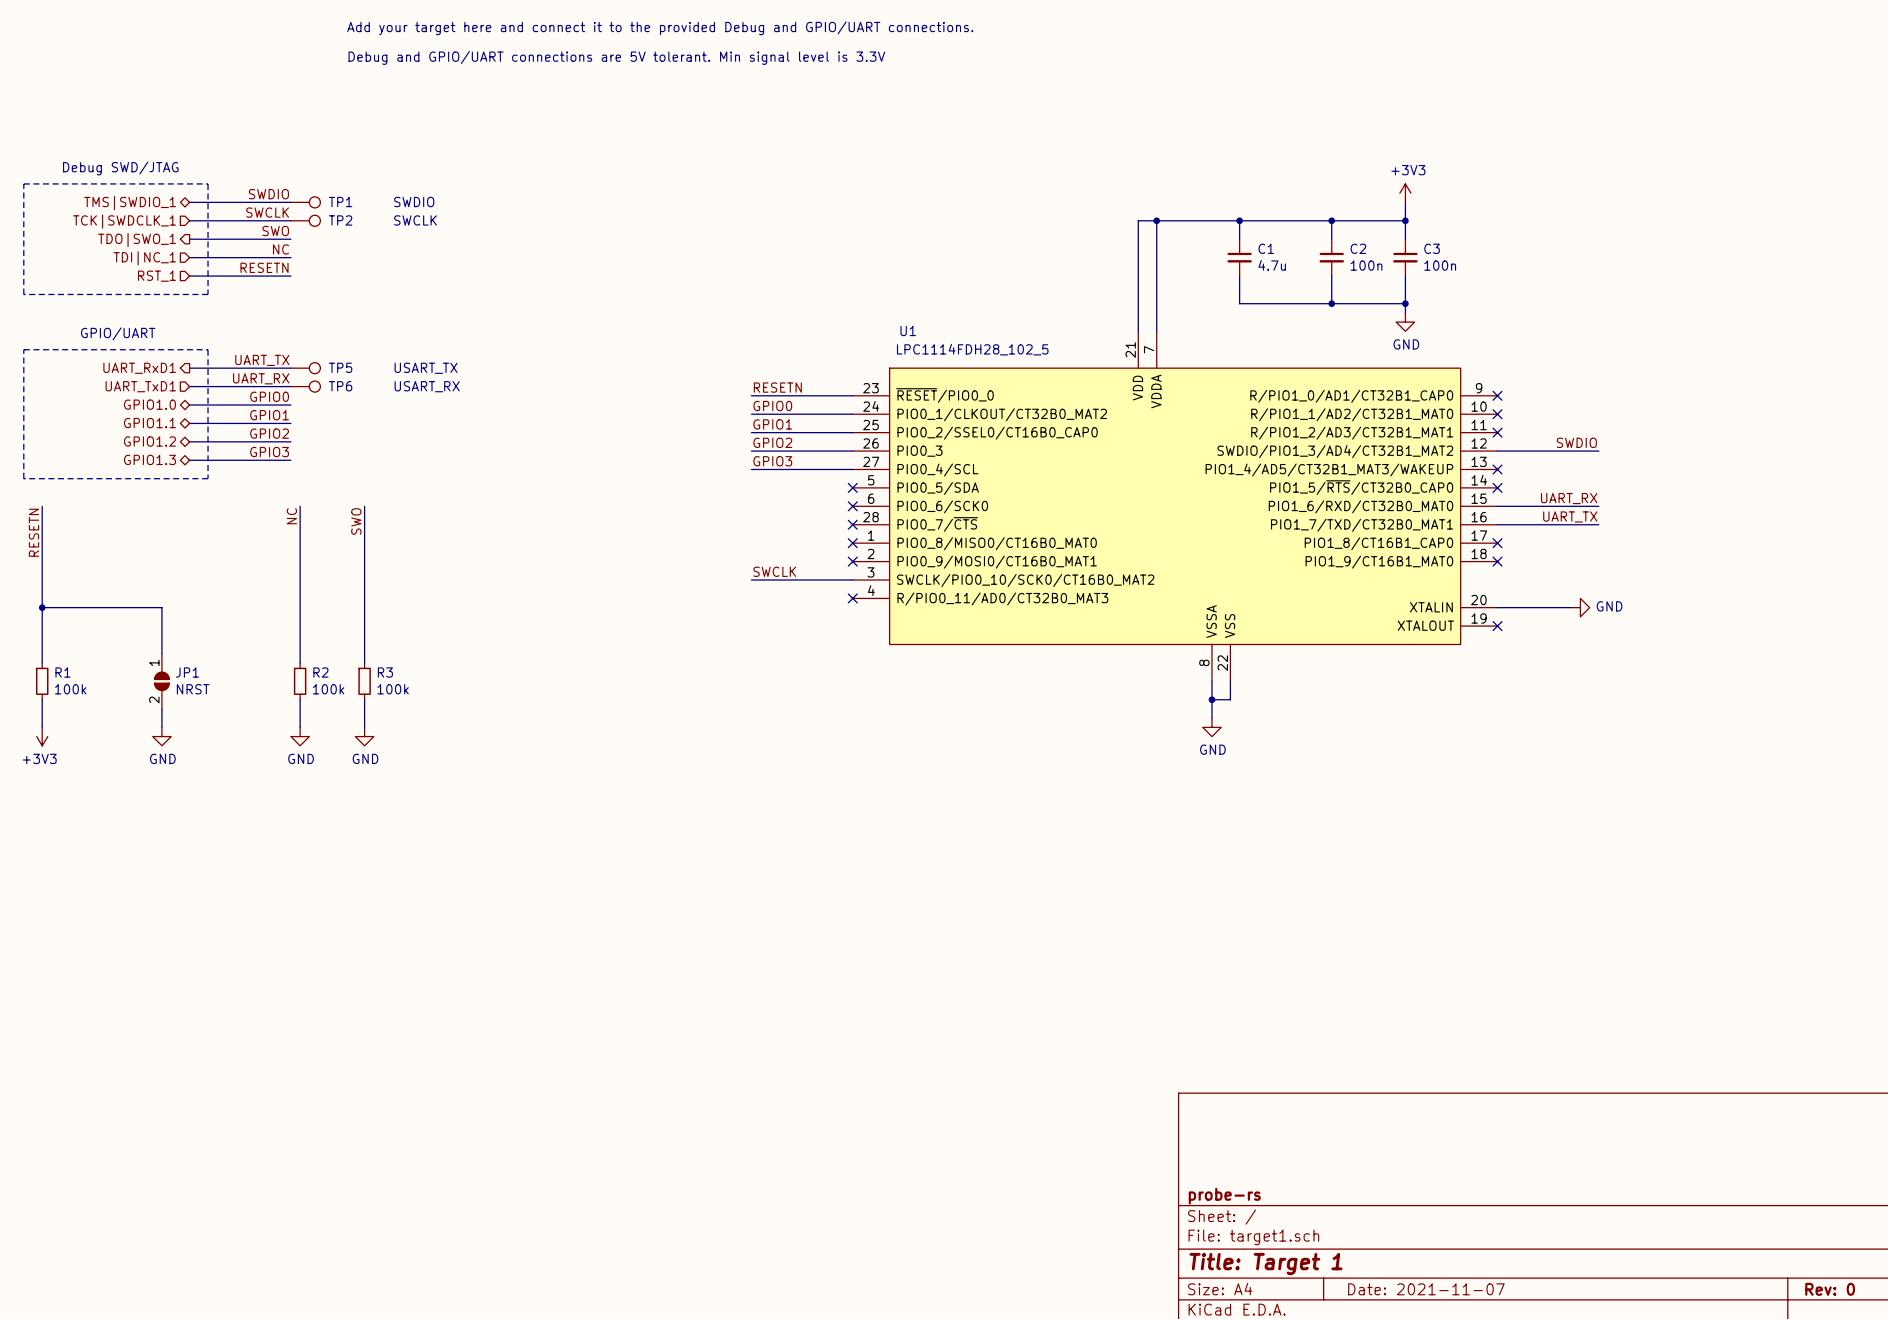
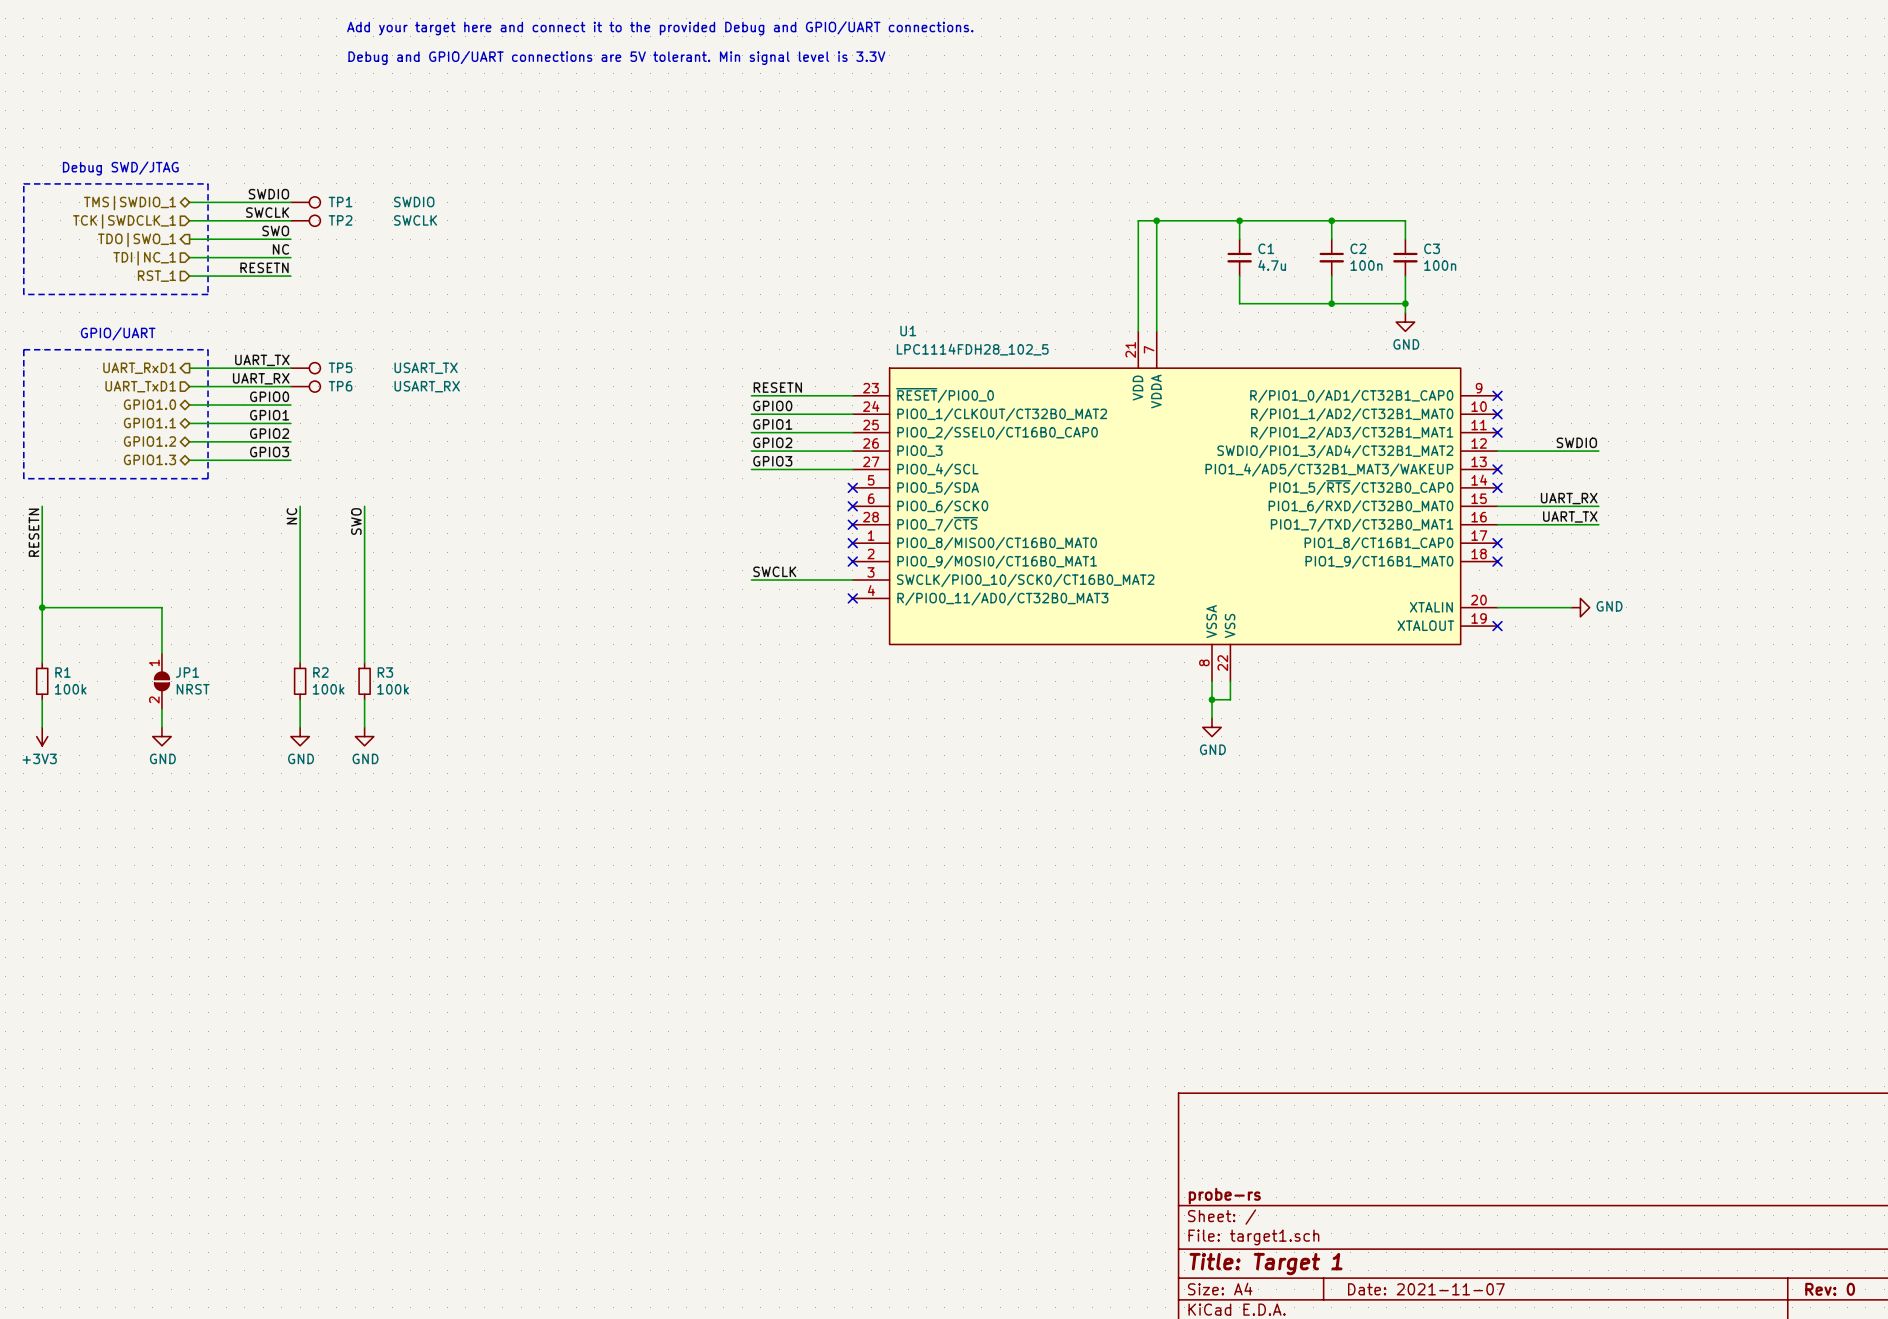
power symbol: +3V3 (1405, 193) -> none
wire: (1405, 202) (1405, 220) -> none
junction: (1405, 220) -> none

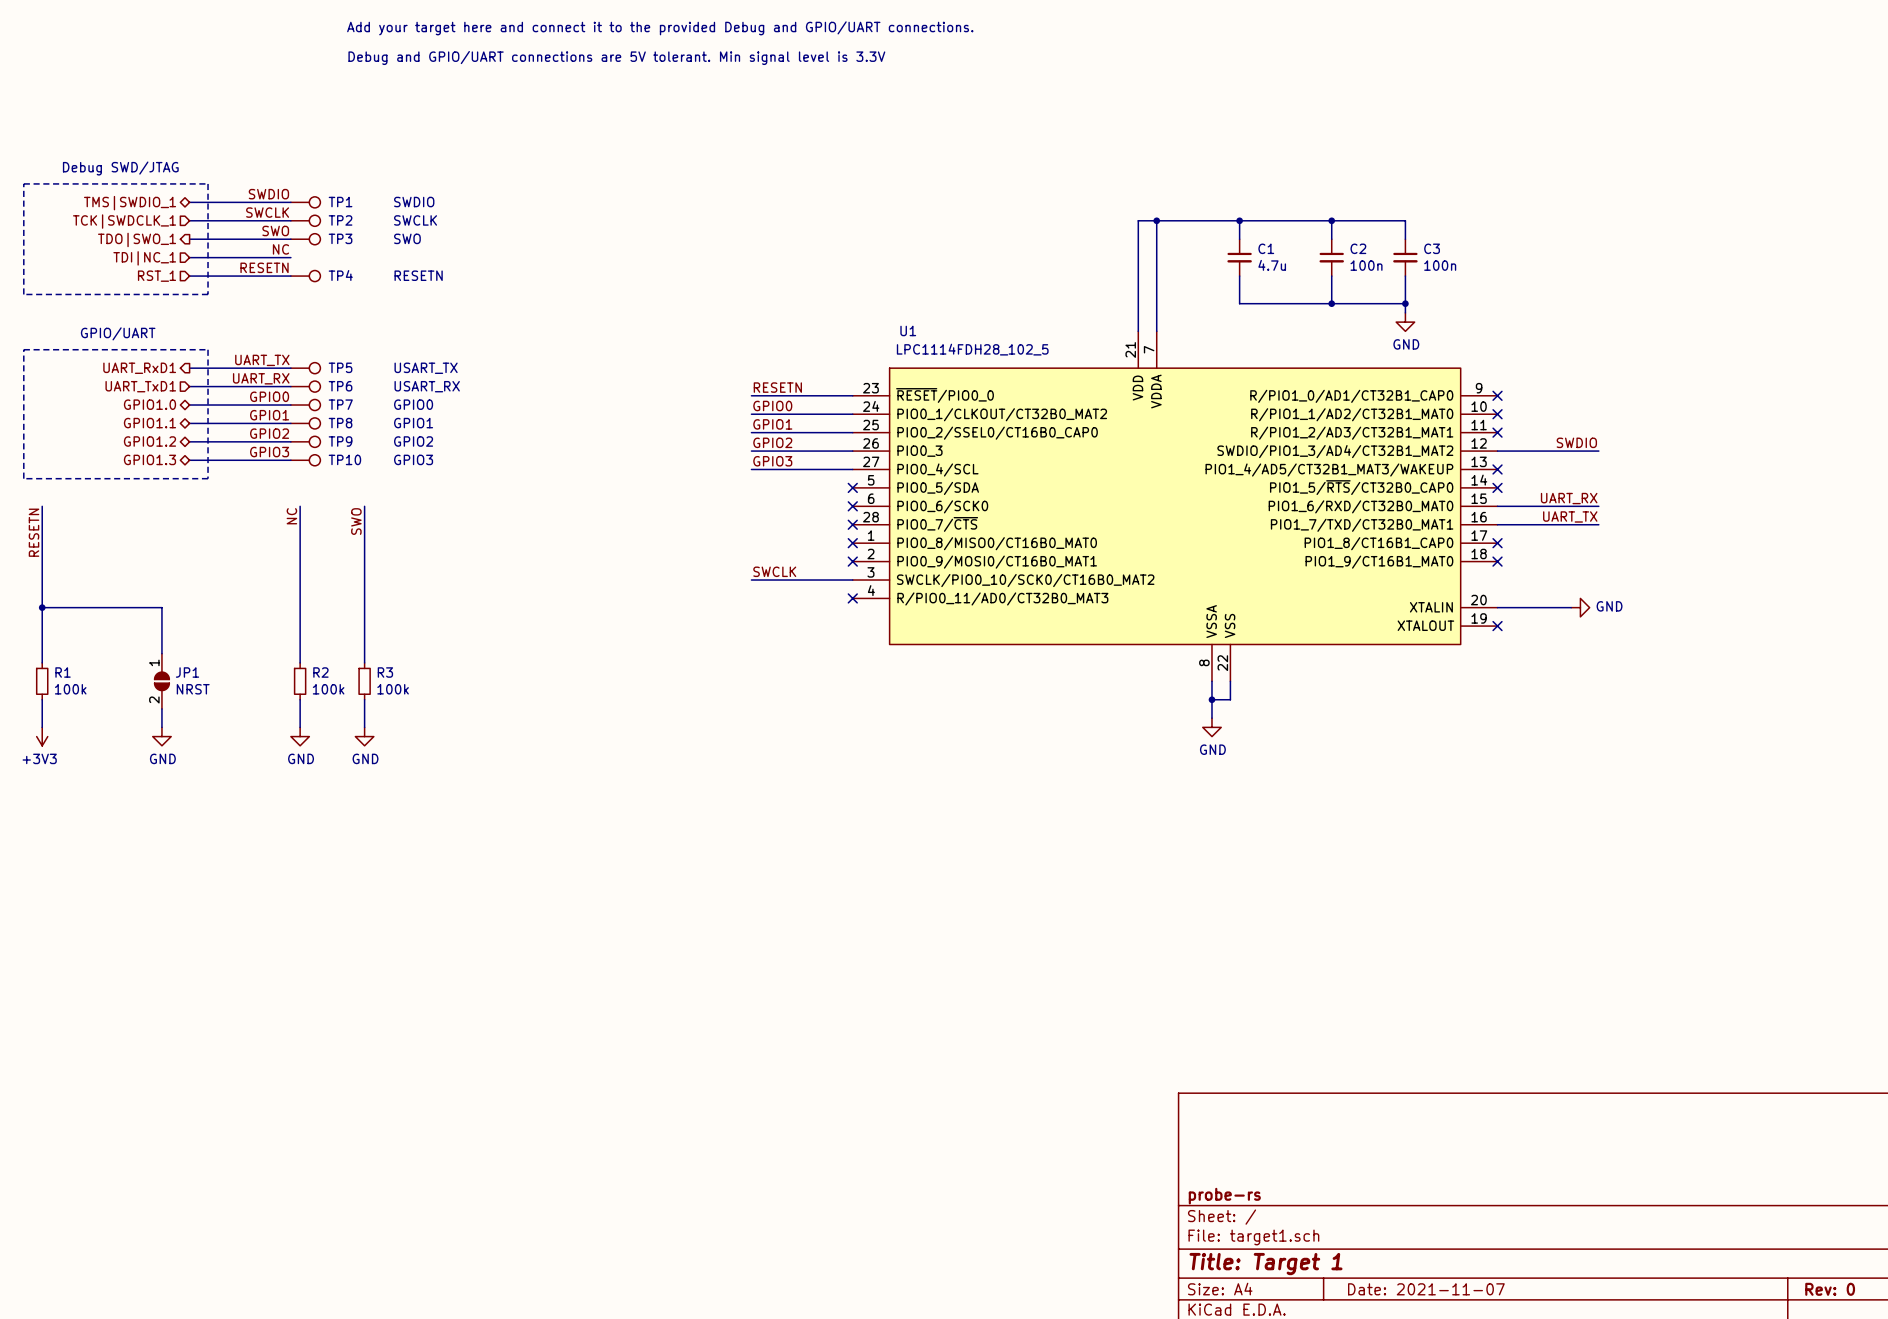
TP3: none -> SWO (305, 239)
TP4: none -> RESETN (305, 276)
TP7: none -> GPIO0 (305, 405)
TP8: none -> GPIO1 (305, 423)
TP9: none -> GPIO2 (305, 441)
TP10: none -> GPIO3 (305, 460)

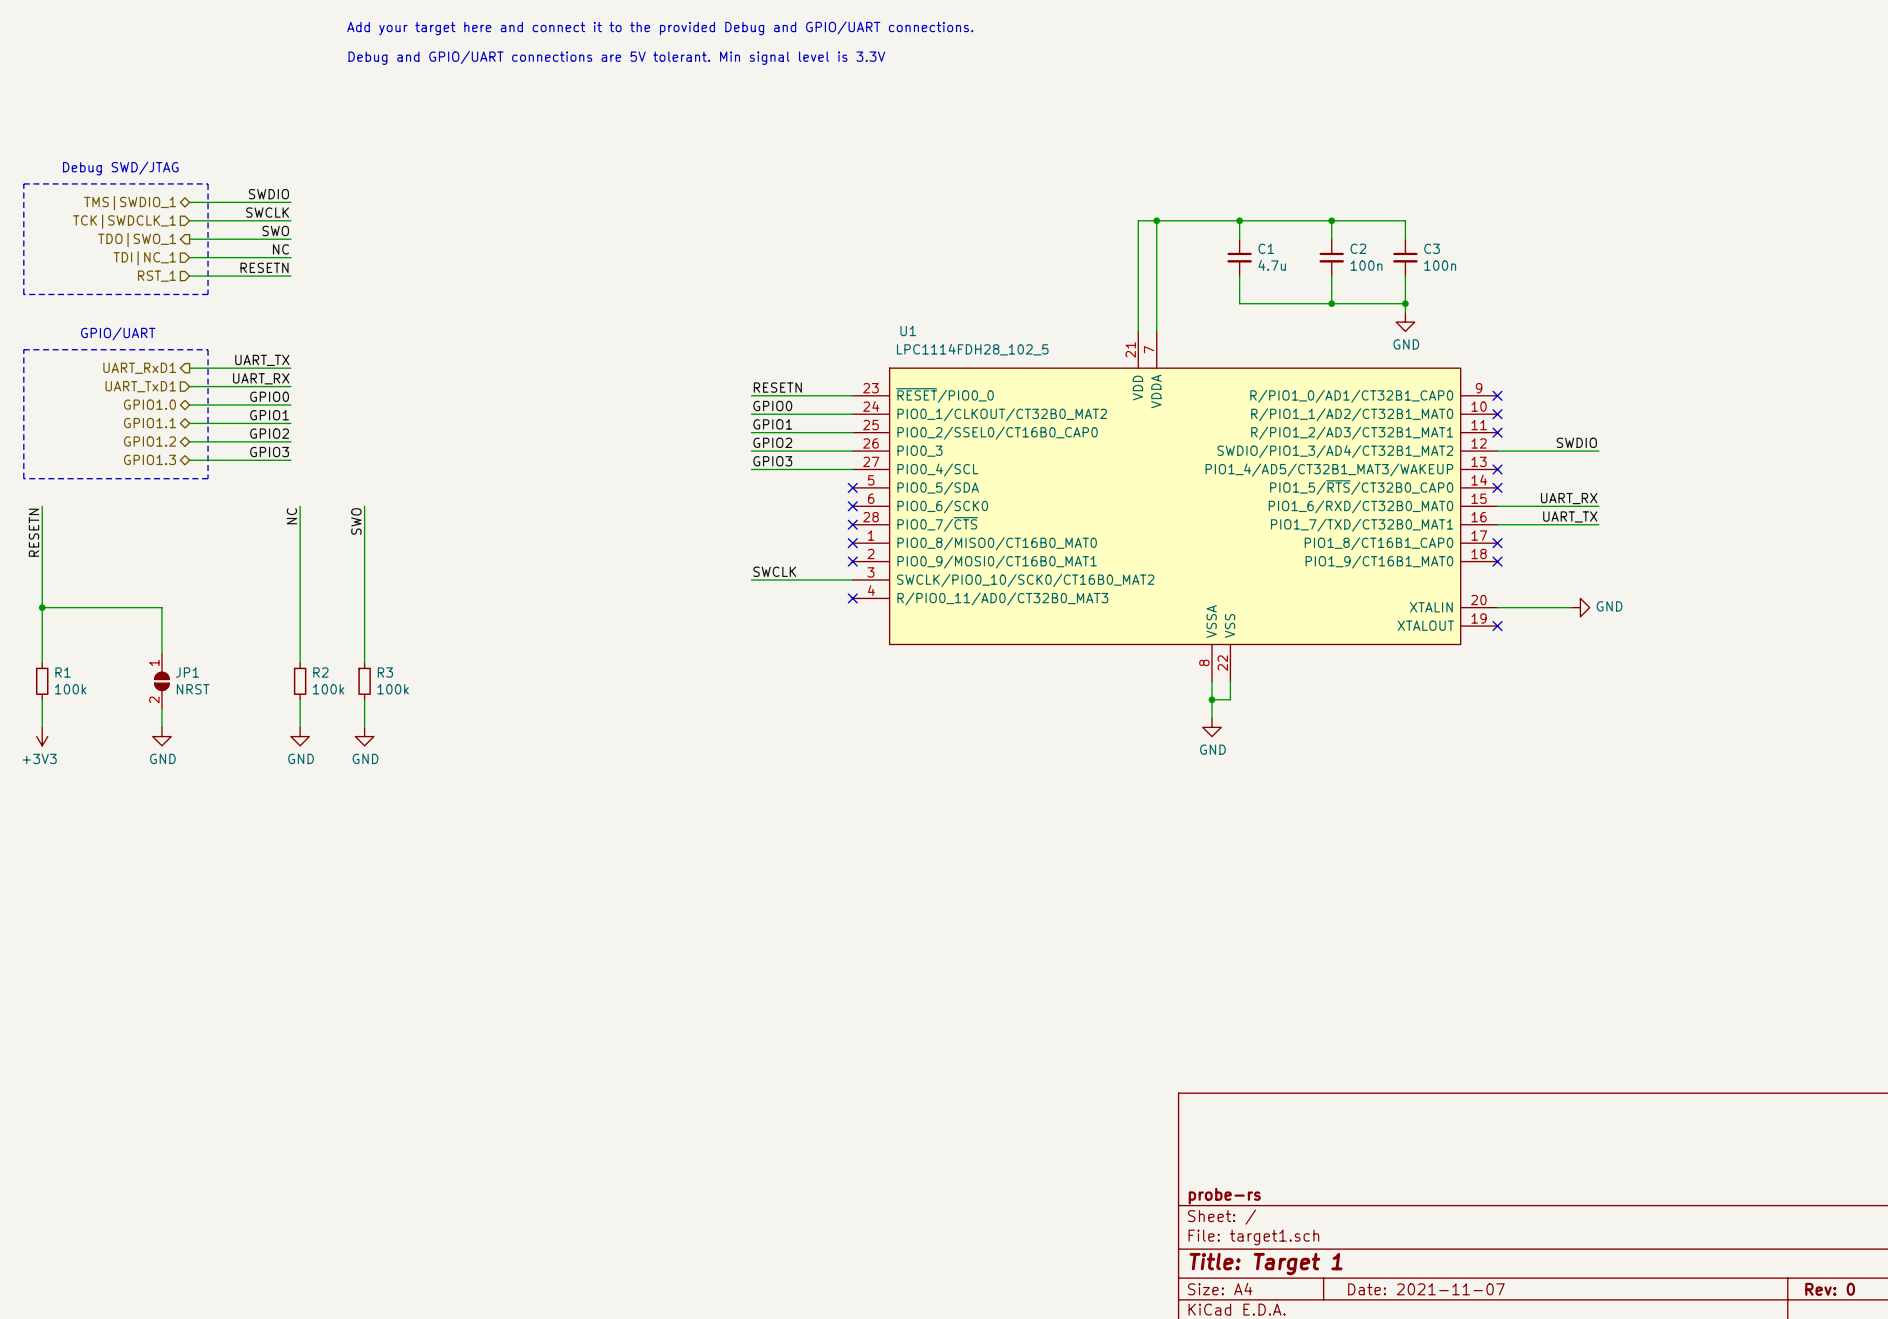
TP1: SWDIO (305, 202) -> none
TP2: SWCLK (305, 220) -> none
TP3: SWO (305, 239) -> none
TP4: RESETN (305, 276) -> none
TP5: USART_TX (305, 368) -> none
TP6: USART_RX (305, 386) -> none
TP7: GPIO0 (305, 405) -> none
TP8: GPIO1 (305, 423) -> none
TP9: GPIO2 (305, 441) -> none
TP10: GPIO3 (305, 460) -> none

